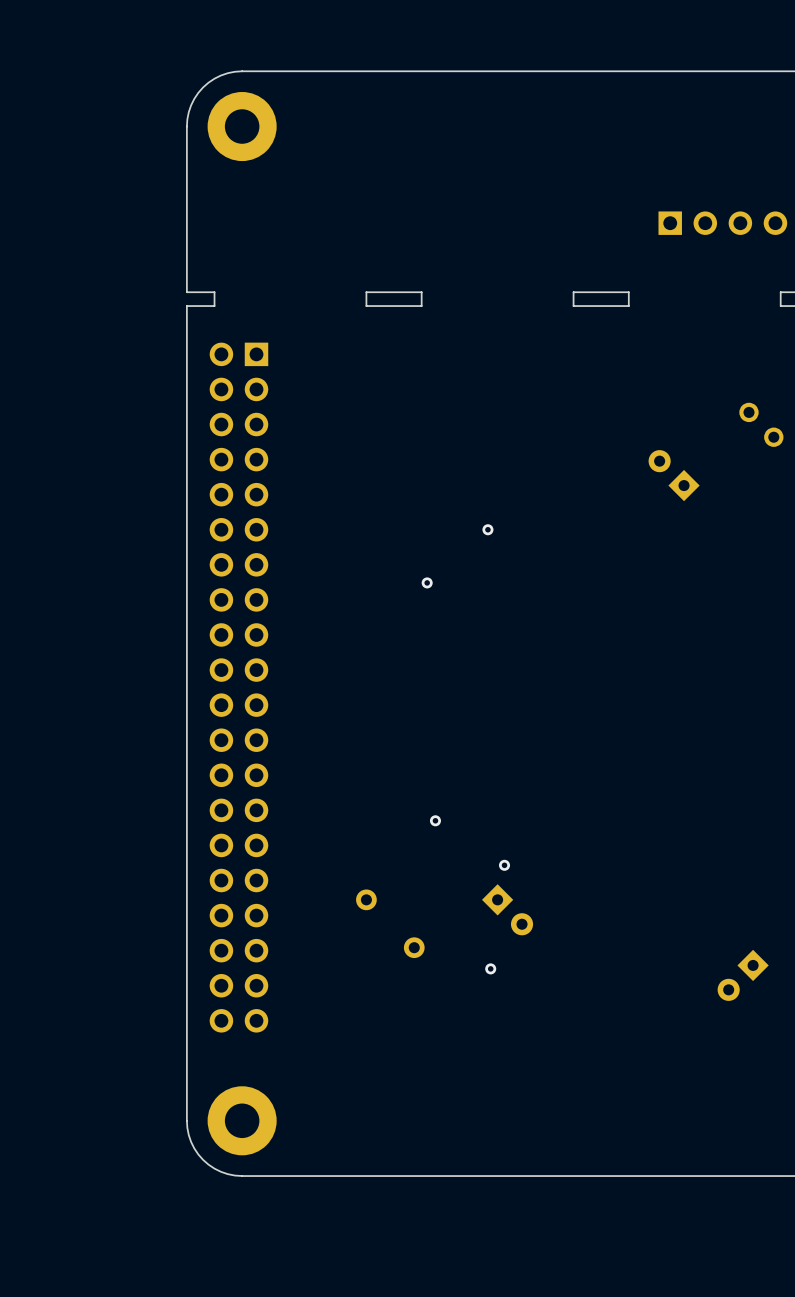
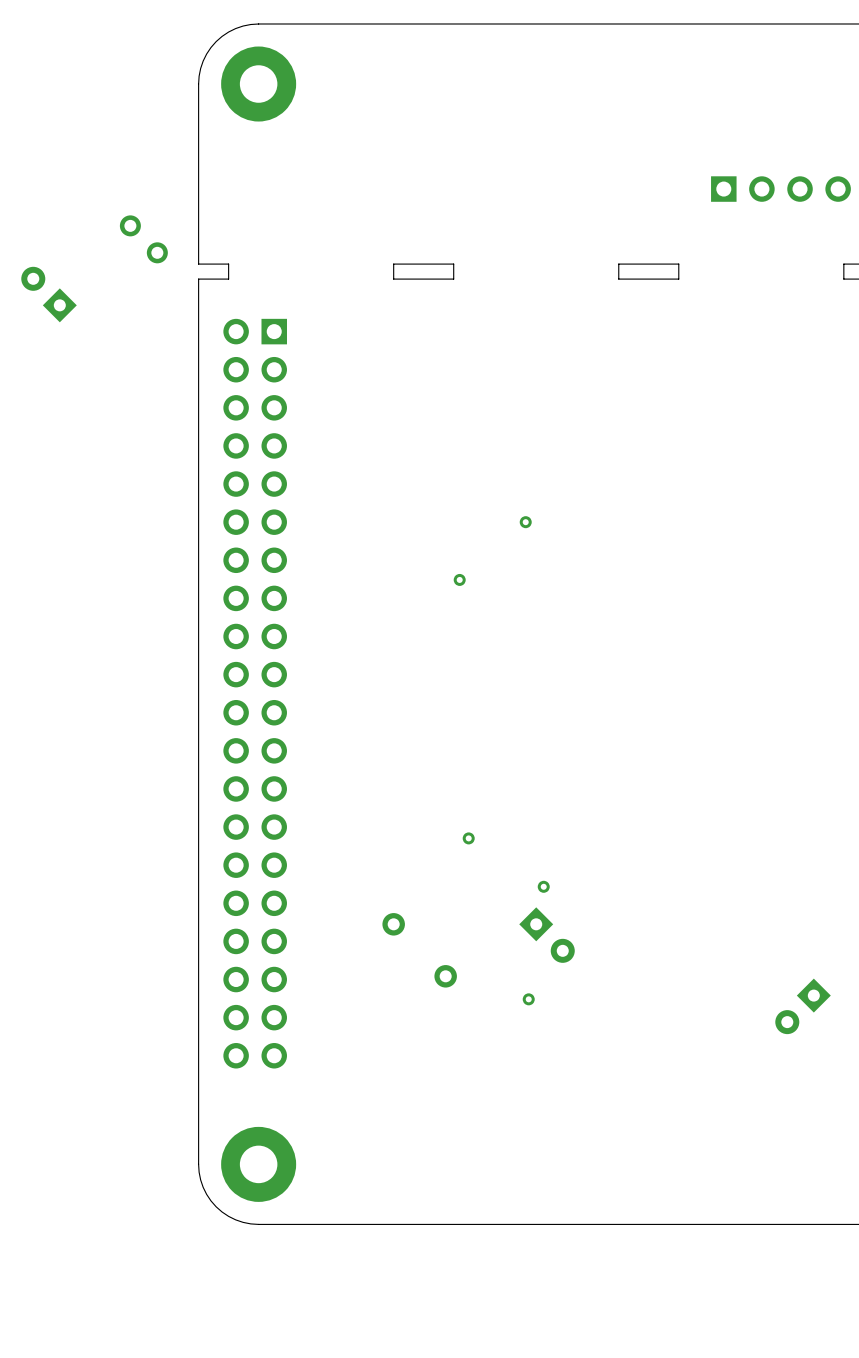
part: none -> (143, 239)
part: none -> (49, 294)
part: (761, 424) -> none
part: (674, 475) -> none

